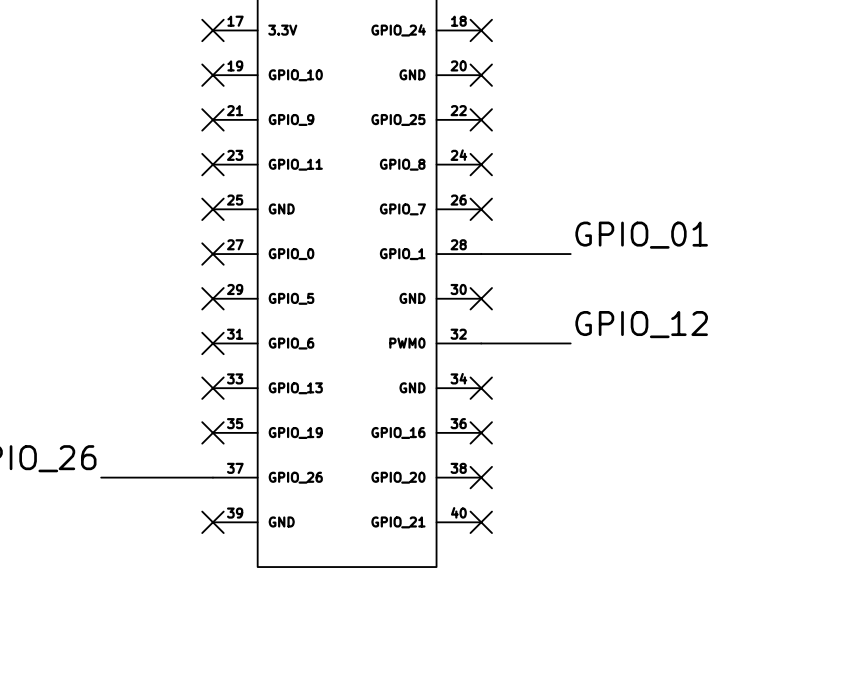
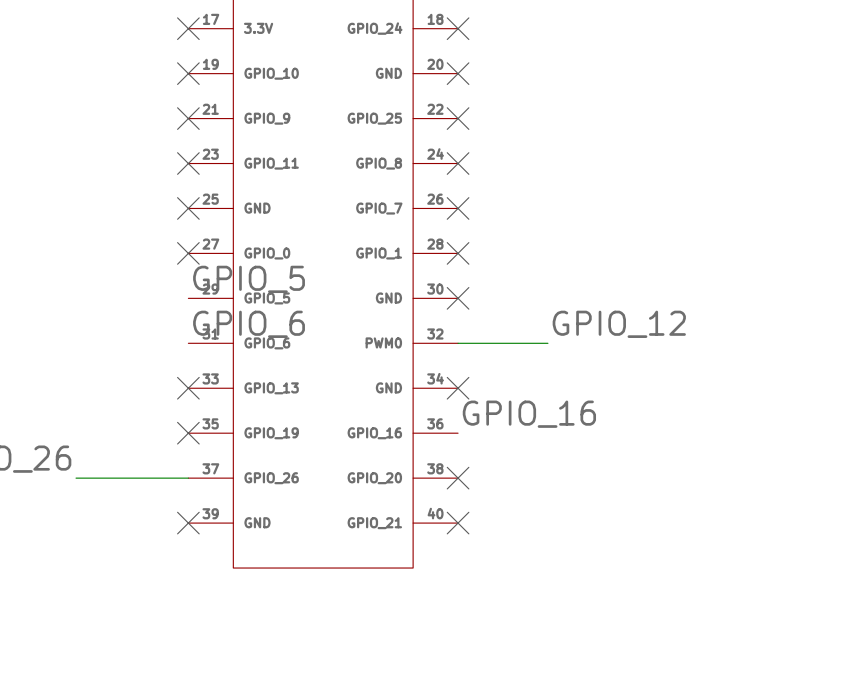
label: GPIO_01 (641, 235) -> none
wire: (481, 254) (570, 254) -> none
no-connect mark: none -> (458, 253)
label: none -> GPIO_5 (249, 279)
no-connect mark: (212, 298) -> none
label: none -> GPIO_6 (249, 324)
no-connect mark: (212, 343) -> none
label: none -> GPIO_16 (529, 414)
no-connect mark: (481, 432) -> none

